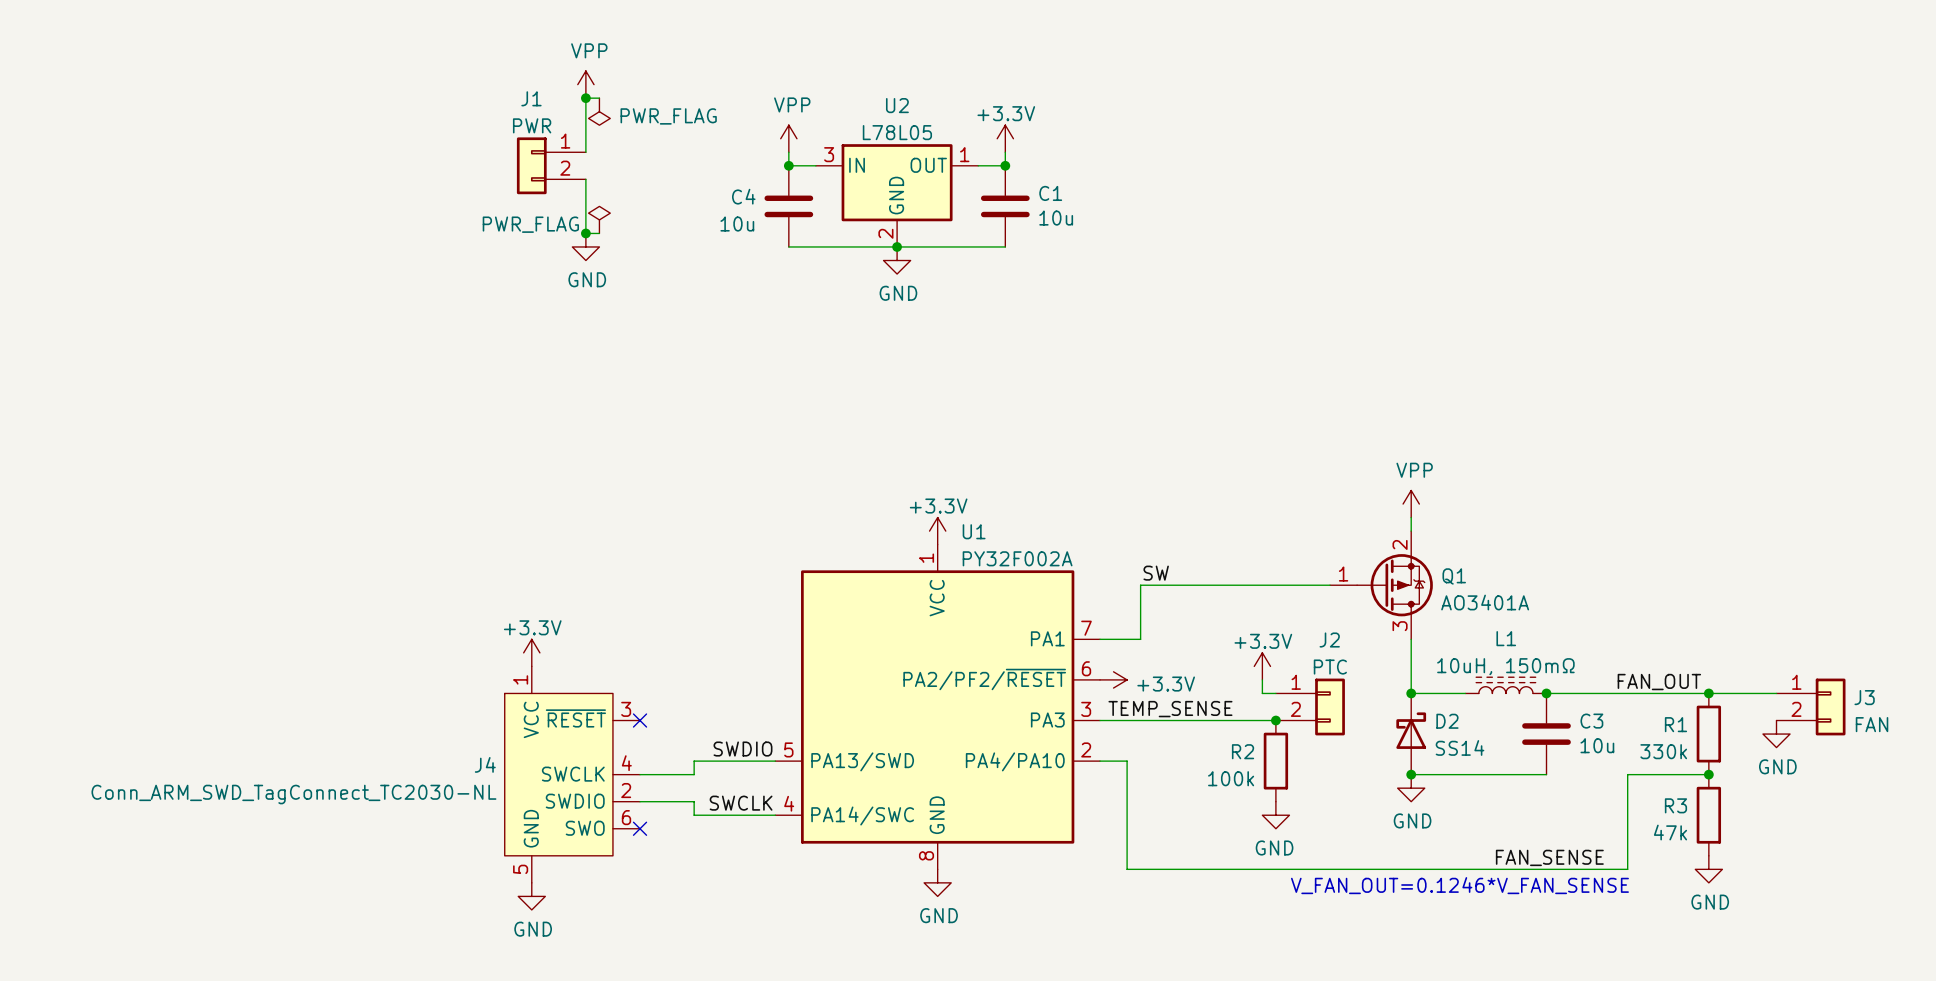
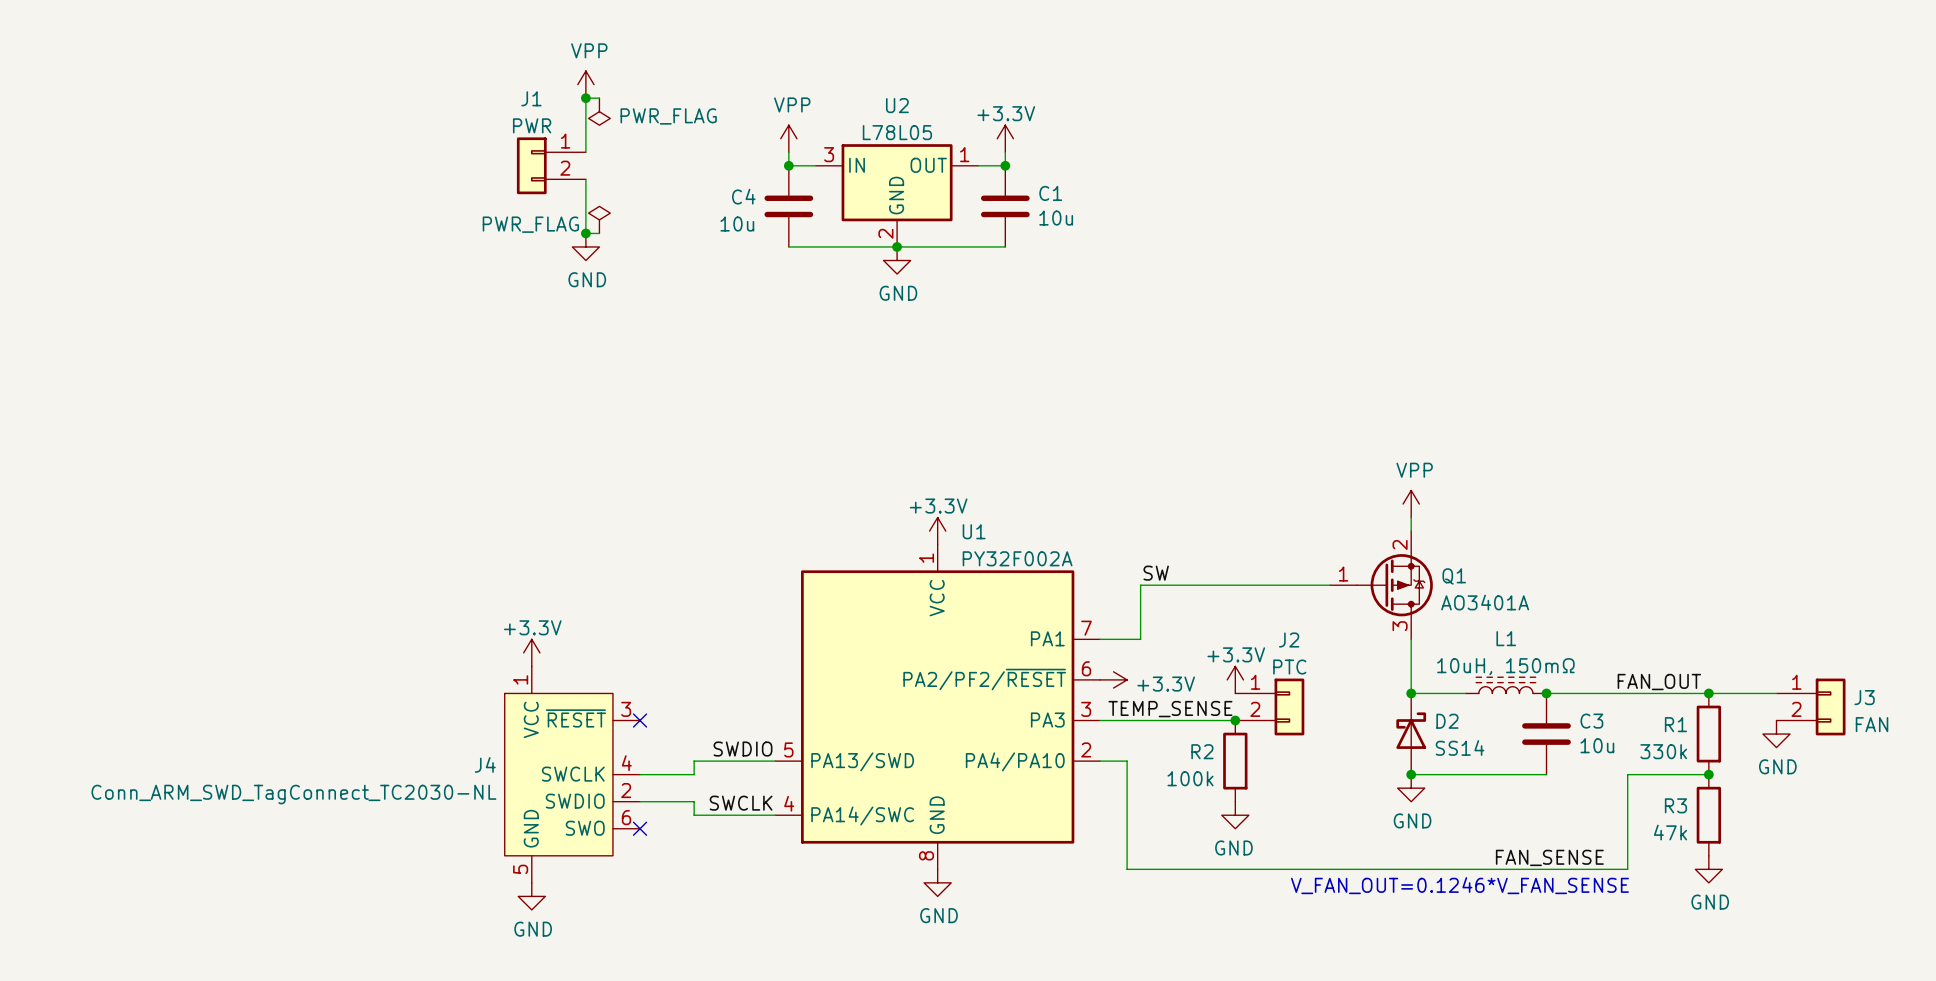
power symbol position: +3.3V (1262, 666) -> +3.3V (1235, 679)
wire: (1262, 679) (1262, 693) (1275, 693) -> none
J2 position: (1310, 706) -> (1269, 706)
junction position: (1275, 720) -> (1235, 720)
R2 position: (1275, 761) -> (1235, 761)
power symbol position: GND (1275, 815) -> GND (1235, 815)

